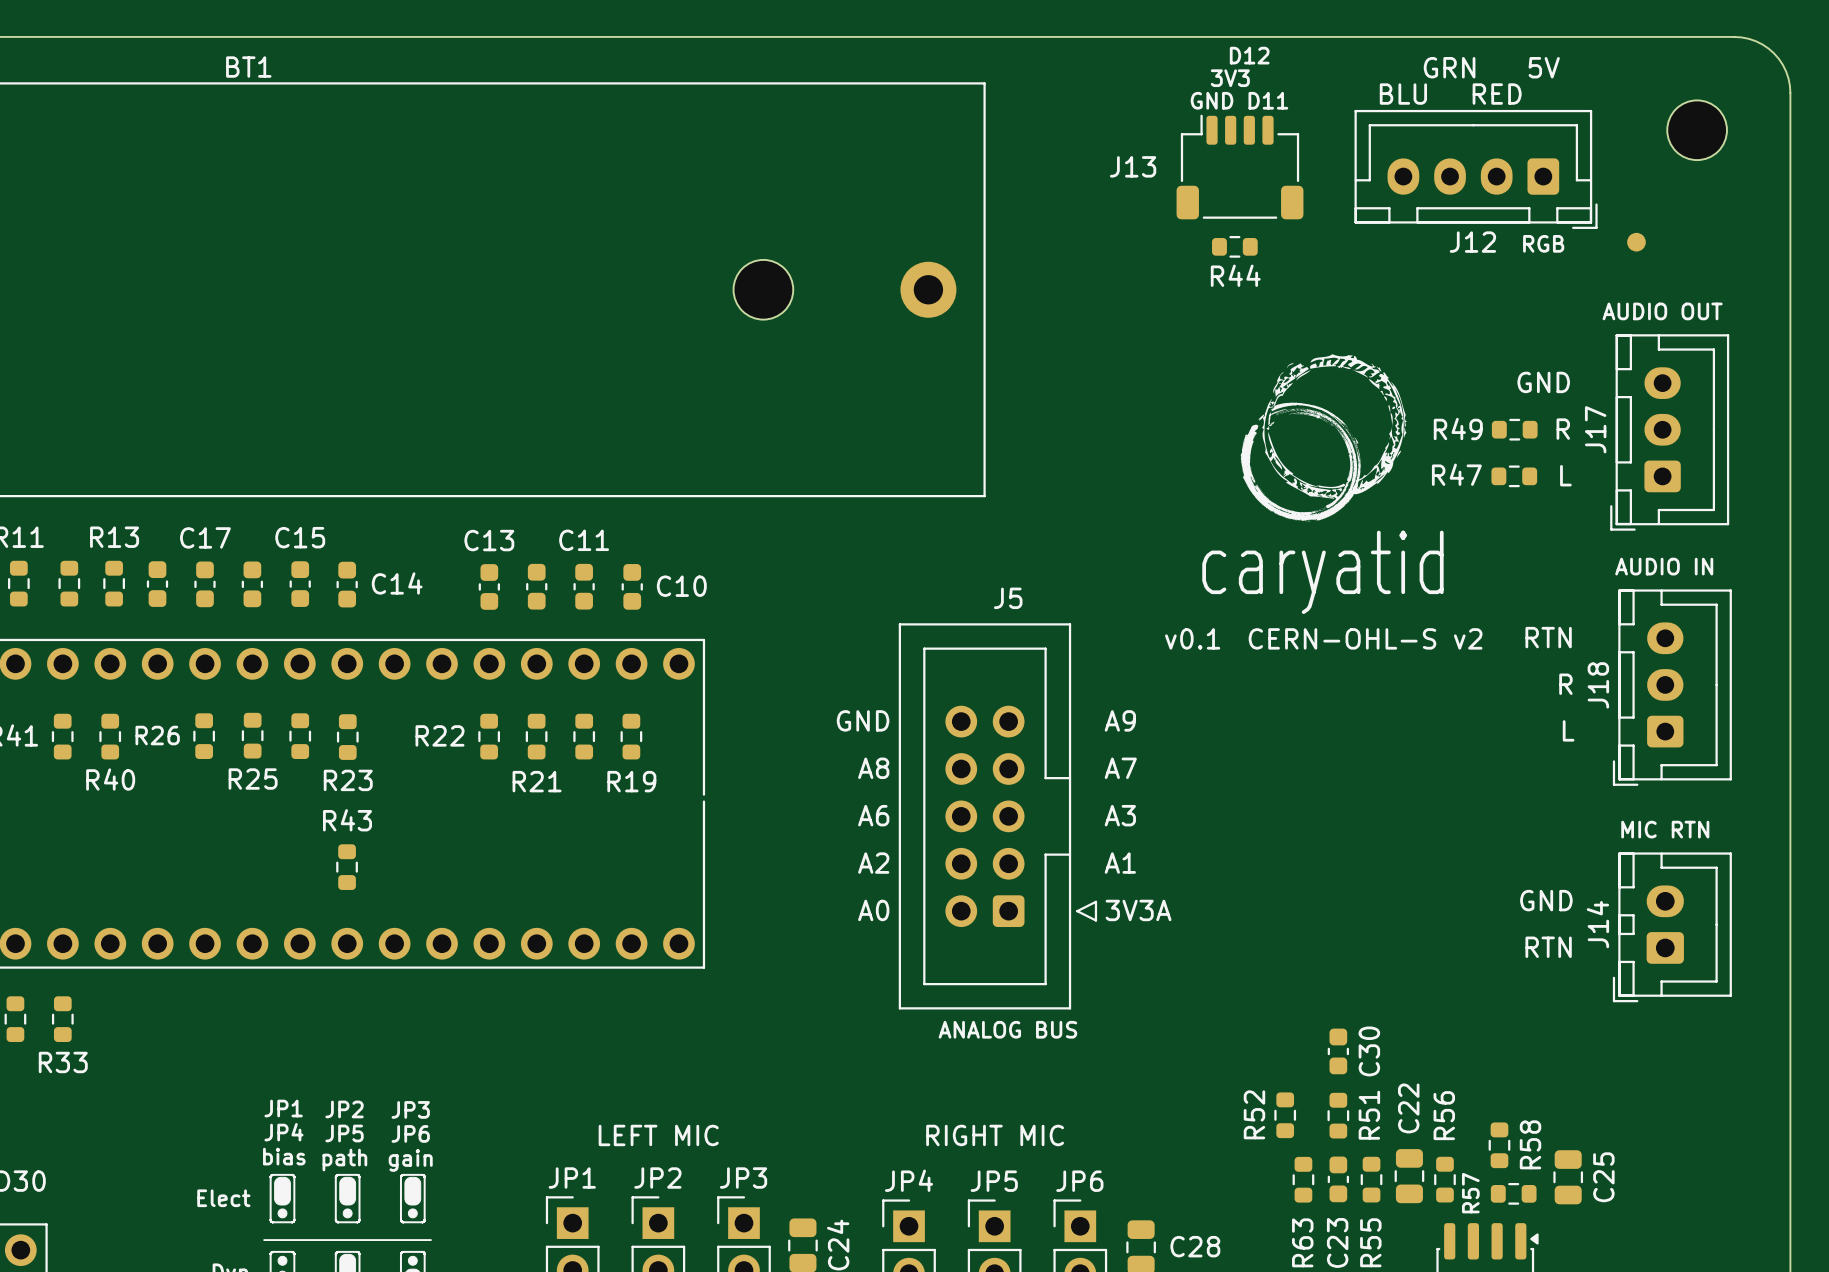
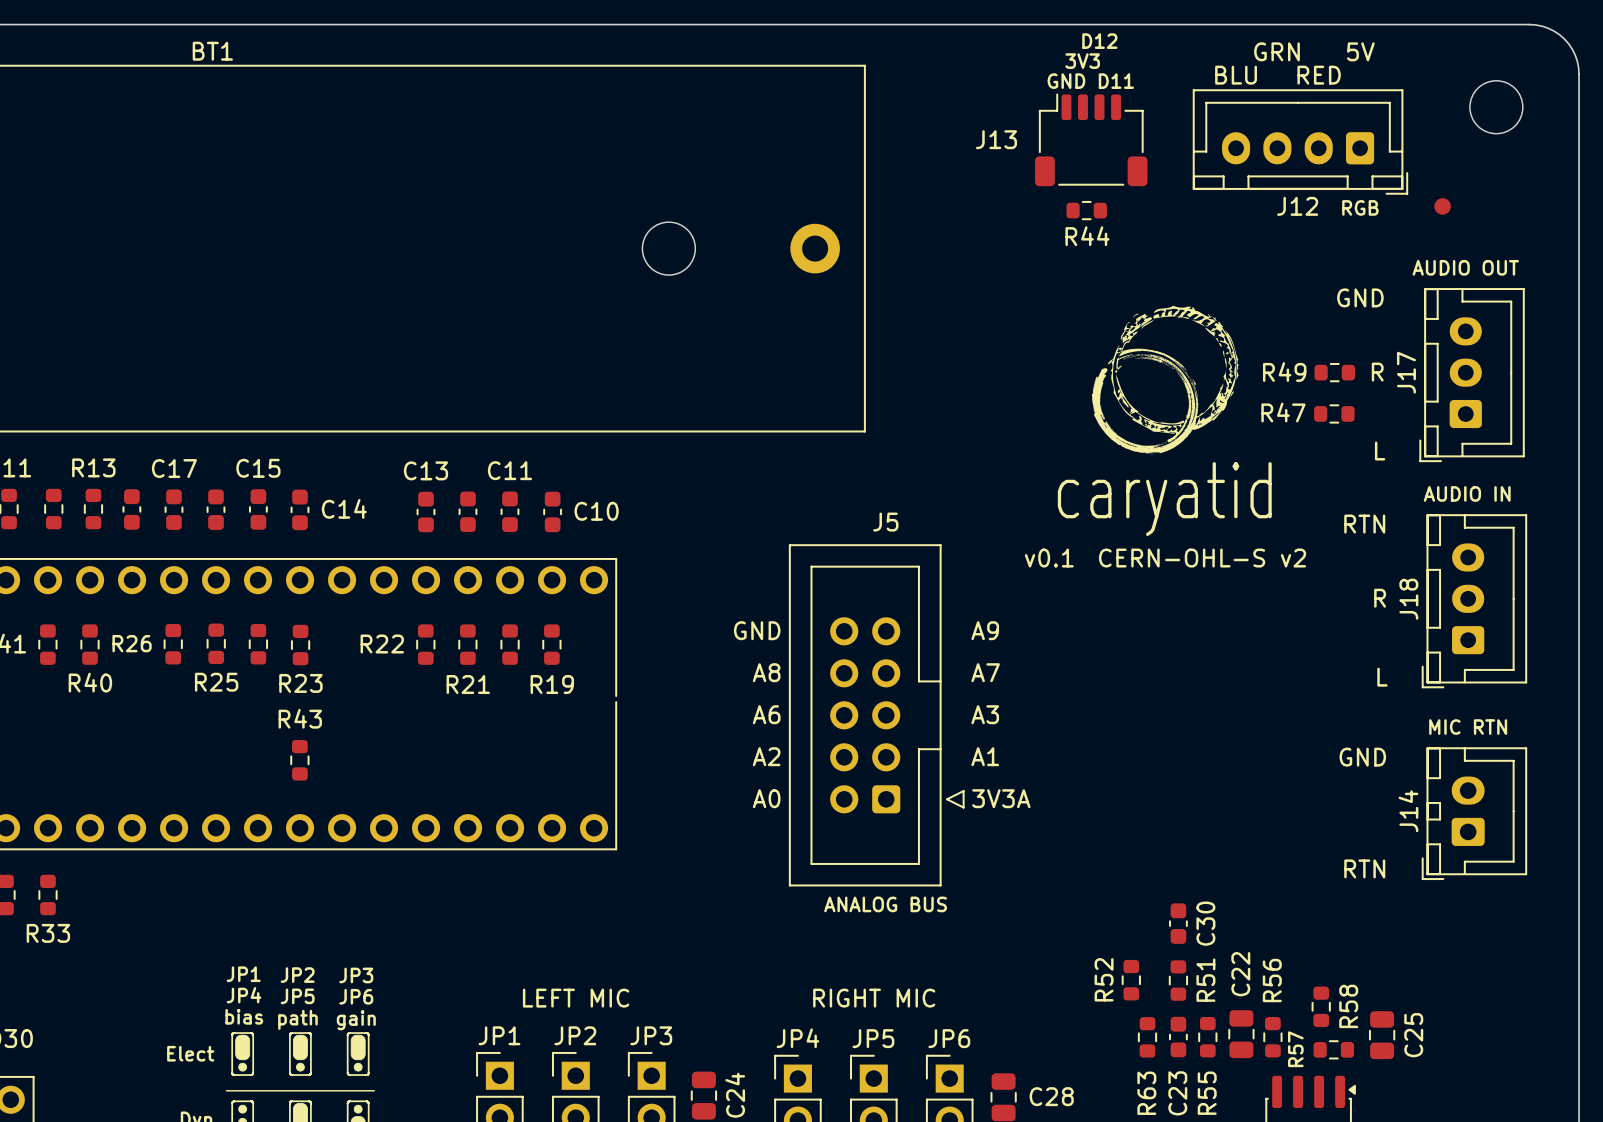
text position: GND (1543, 382) -> GND (1360, 297)
text position: L (1565, 475) -> L (1380, 451)
text position: RTN (1548, 637) -> RTN (1364, 524)
text position: L (1568, 730) -> L (1382, 677)
text position: GND (1546, 900) -> GND (1362, 757)
text position: RTN (1548, 947) -> RTN (1364, 868)

